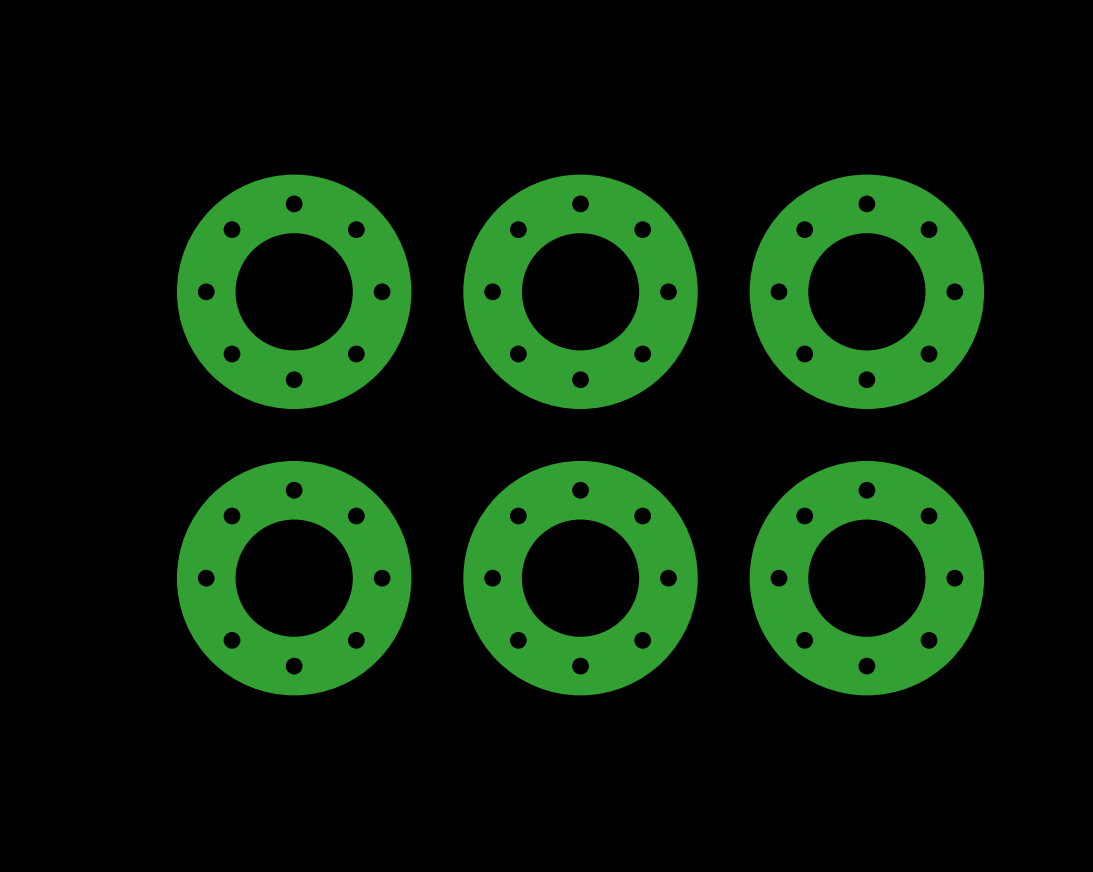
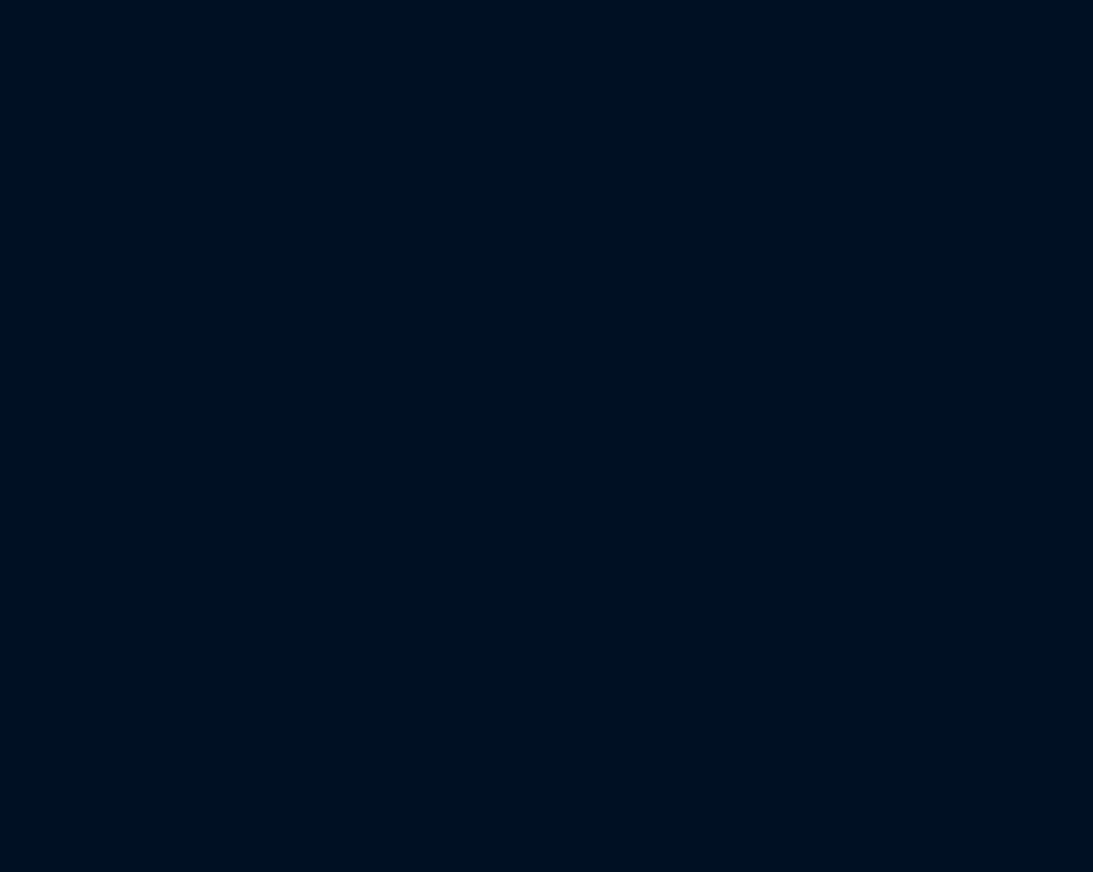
part: (294, 291) -> none
part: (580, 291) -> none
part: (866, 291) -> none
part: (294, 578) -> none
part: (580, 578) -> none
part: (866, 578) -> none

